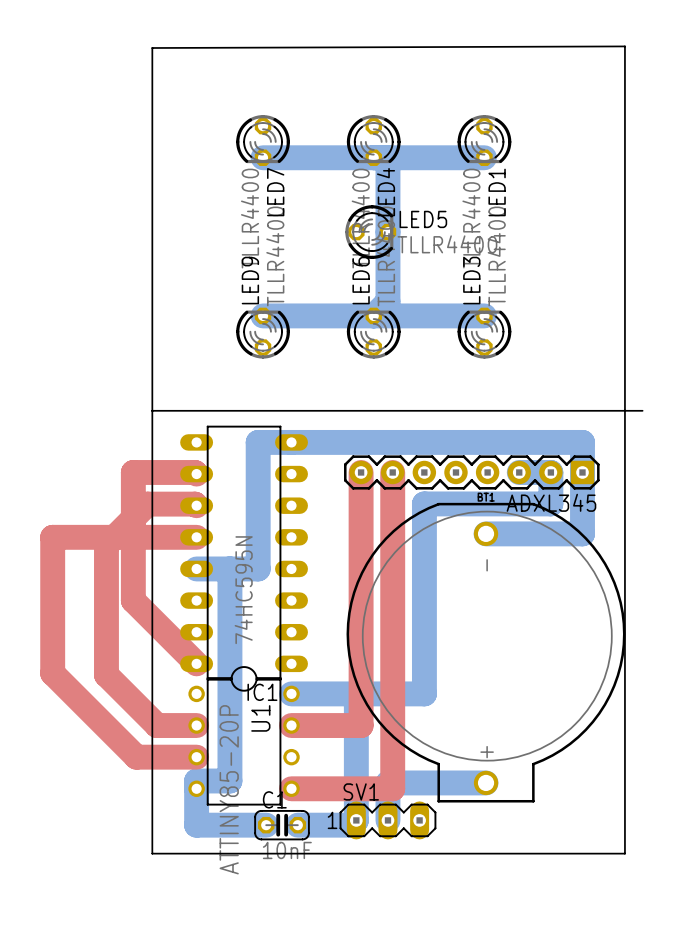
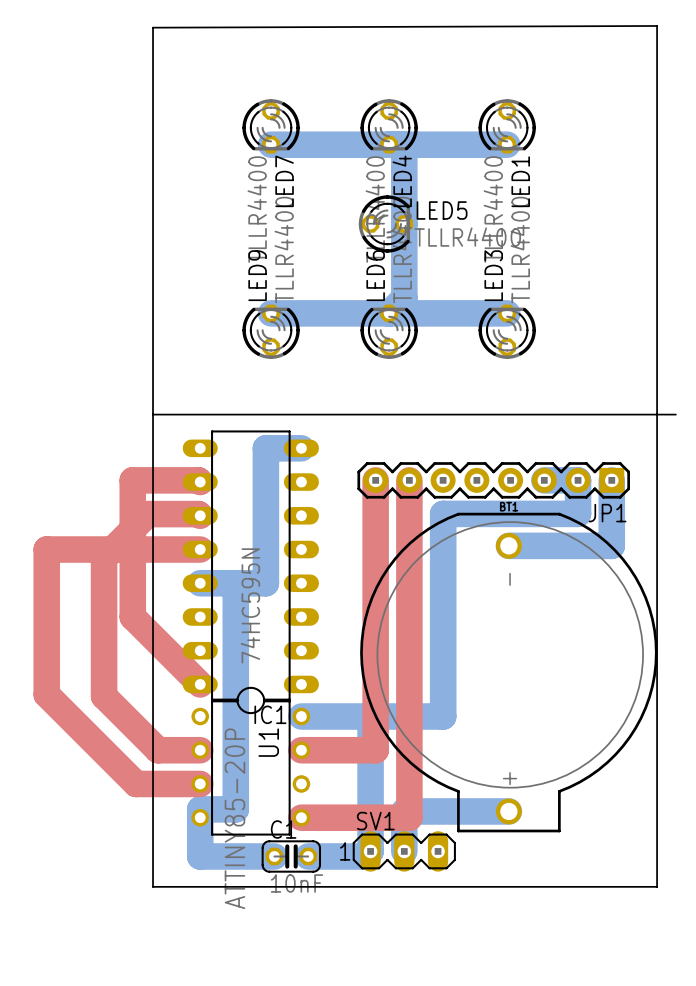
bottom track: (291, 442) (582, 442) (582, 472) -> none
ADXL345 name: ADXL345 (551, 502) -> JP1 (607, 513)

